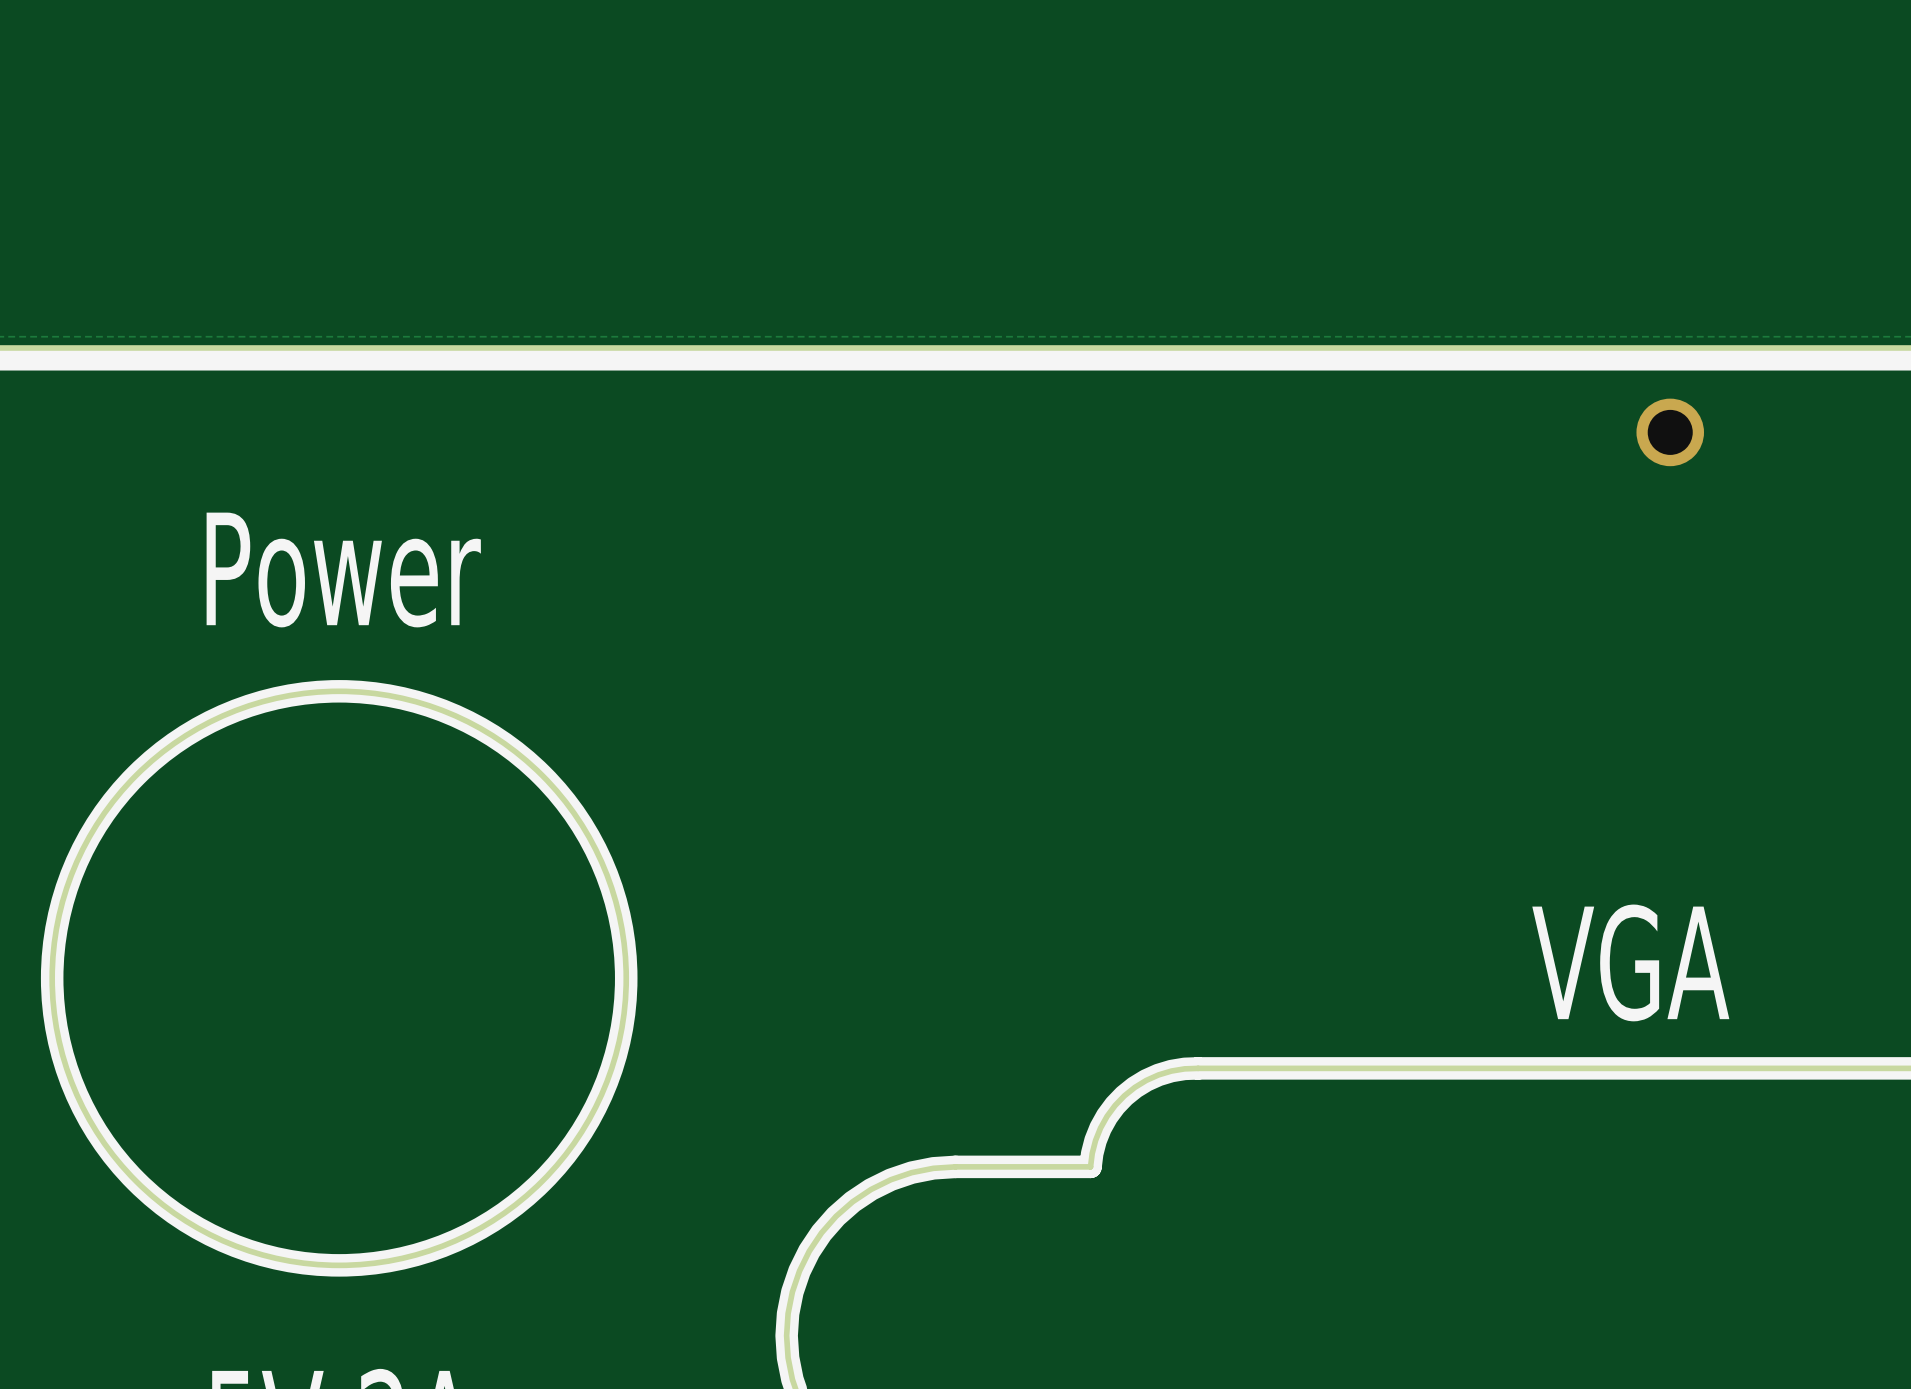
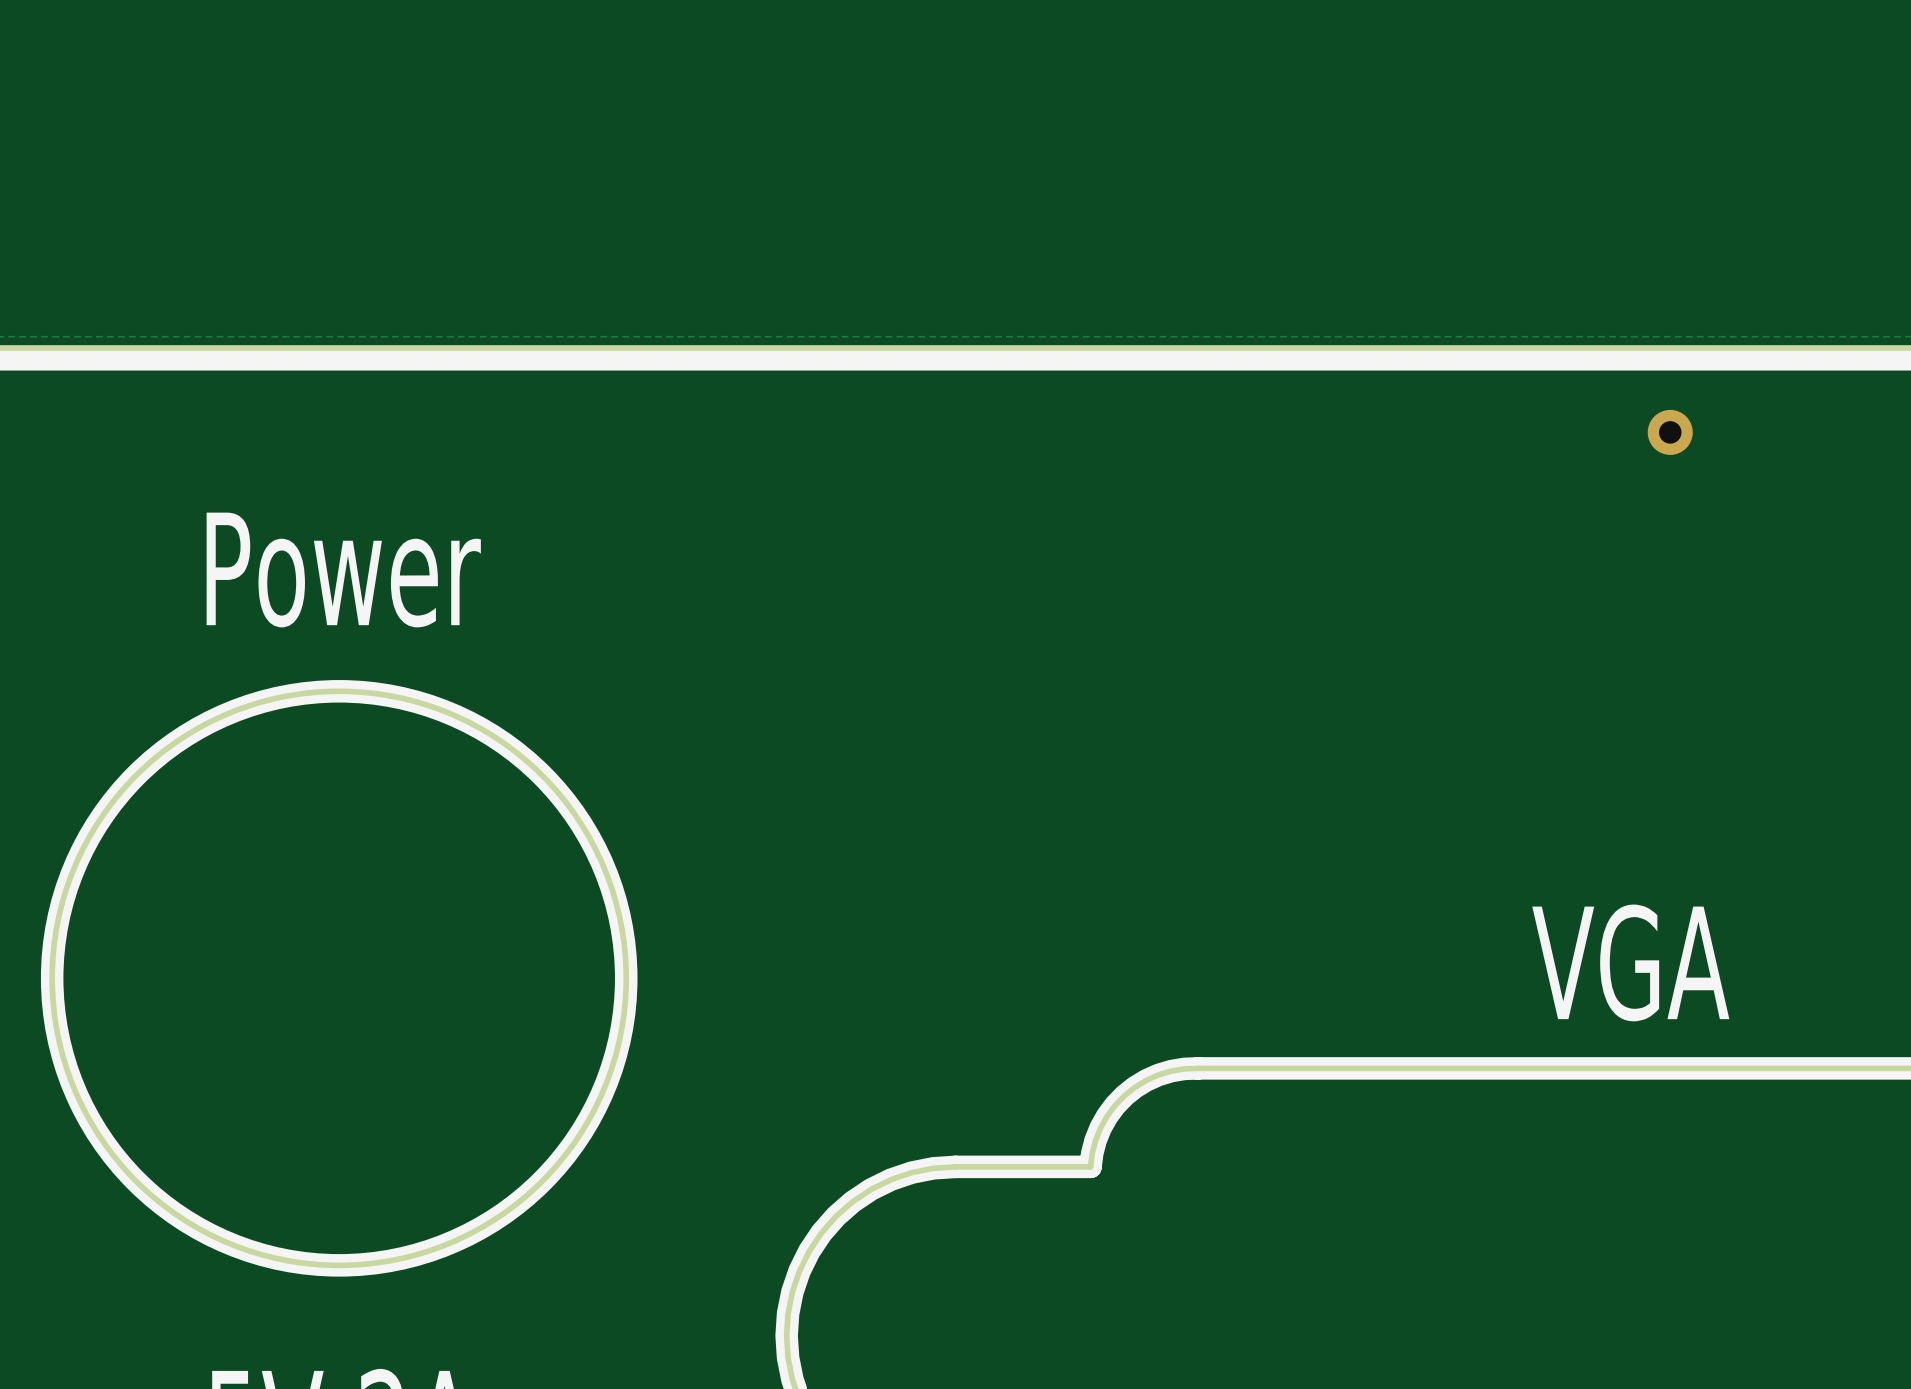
via size: [1636, 398, 1705, 467] -> [1647, 409, 1693, 455]

